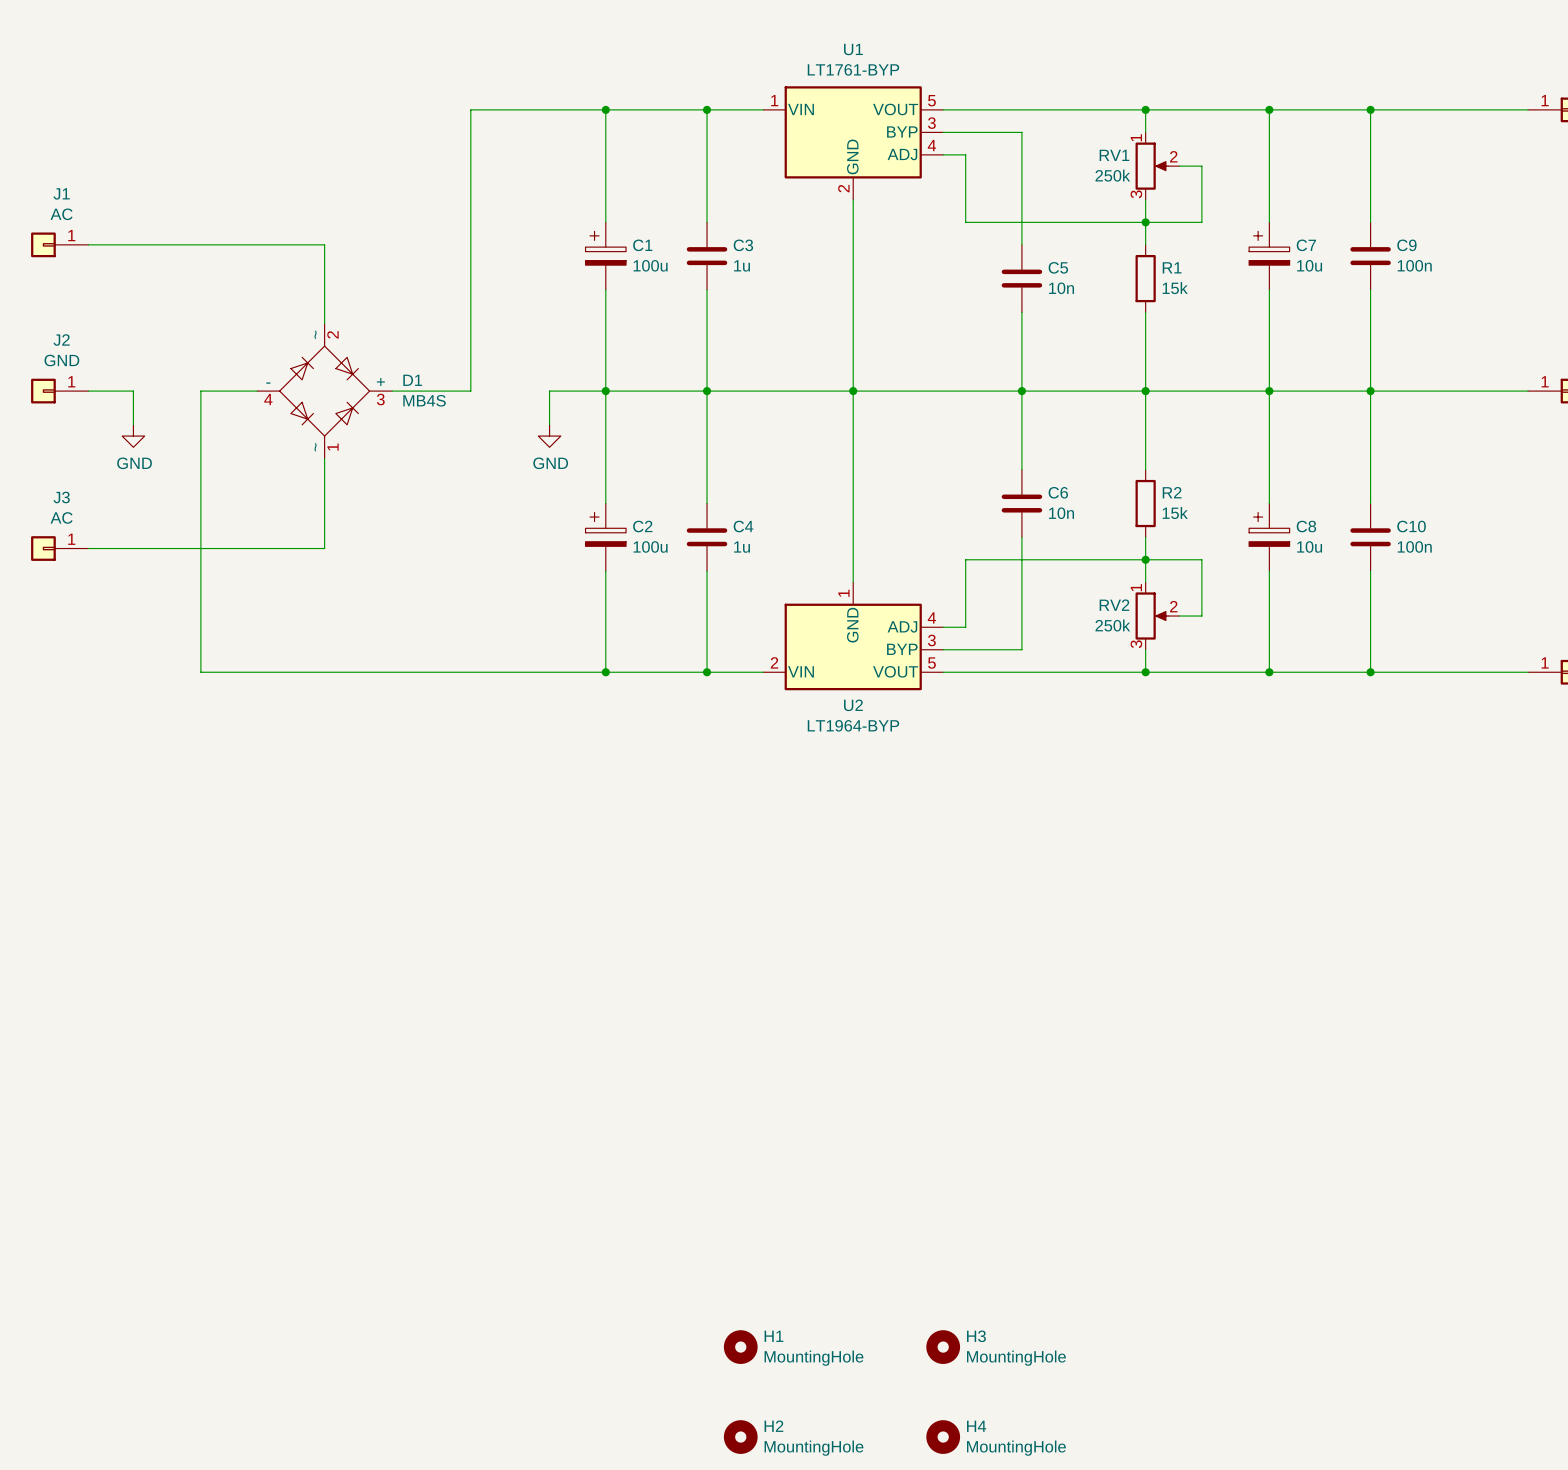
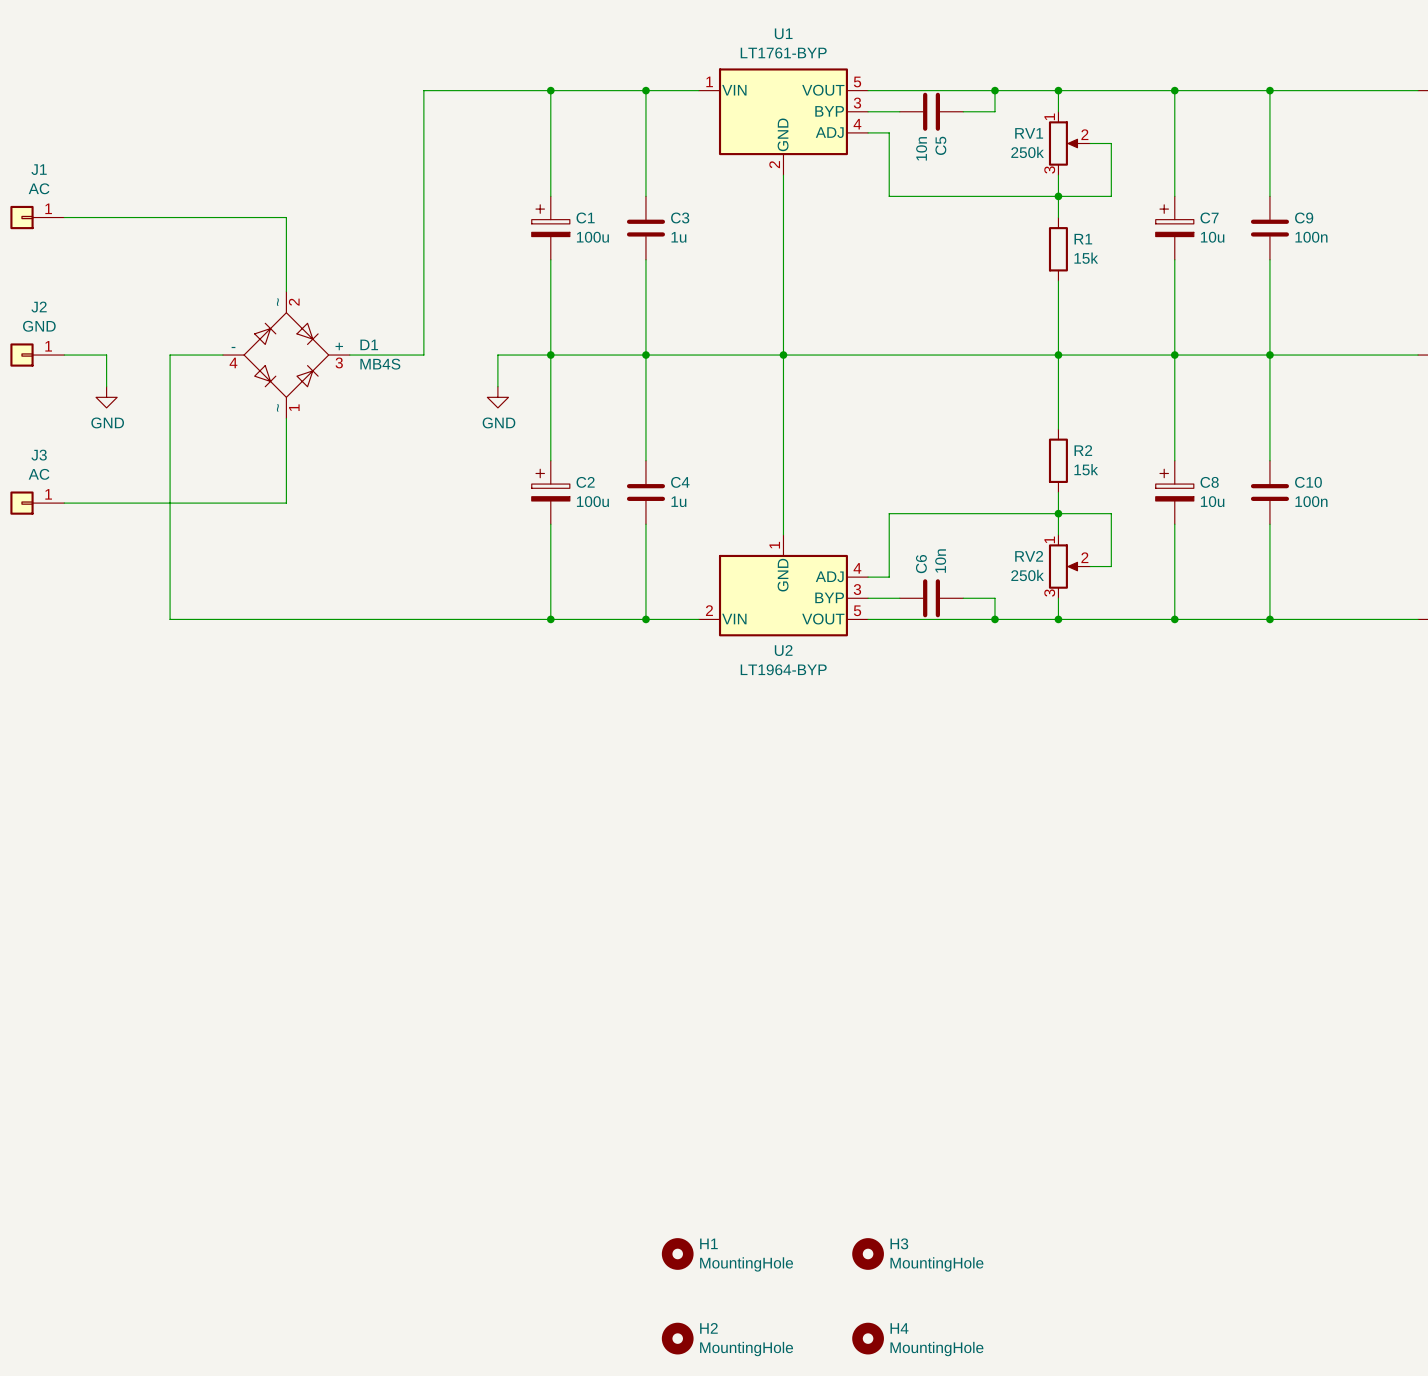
wire: none -> (994, 90) (994, 111) (963, 111)
junction: none -> (994, 90)
wire: (976, 132) (1021, 132) (1021, 244) -> none
C5 rotation: 0° (1021, 278) -> 90° clockwise (931, 111)
C5 position: (1021, 278) -> (931, 111)
wire: (1021, 312) (1021, 469) -> none
junction: (1021, 391) -> none
C6 name position: C6 (1058, 492) -> C6 (921, 564)
C6 rotation: 0° (1021, 503) -> 90° clockwise (931, 598)
C6 position: (1021, 503) -> (931, 598)
C6 value position: 10n (1061, 513) -> 10n (940, 561)
wire: (1021, 537) (1021, 649) (976, 649) -> none
wire: none -> (963, 598) (994, 598) (994, 619)
junction: none -> (994, 619)

